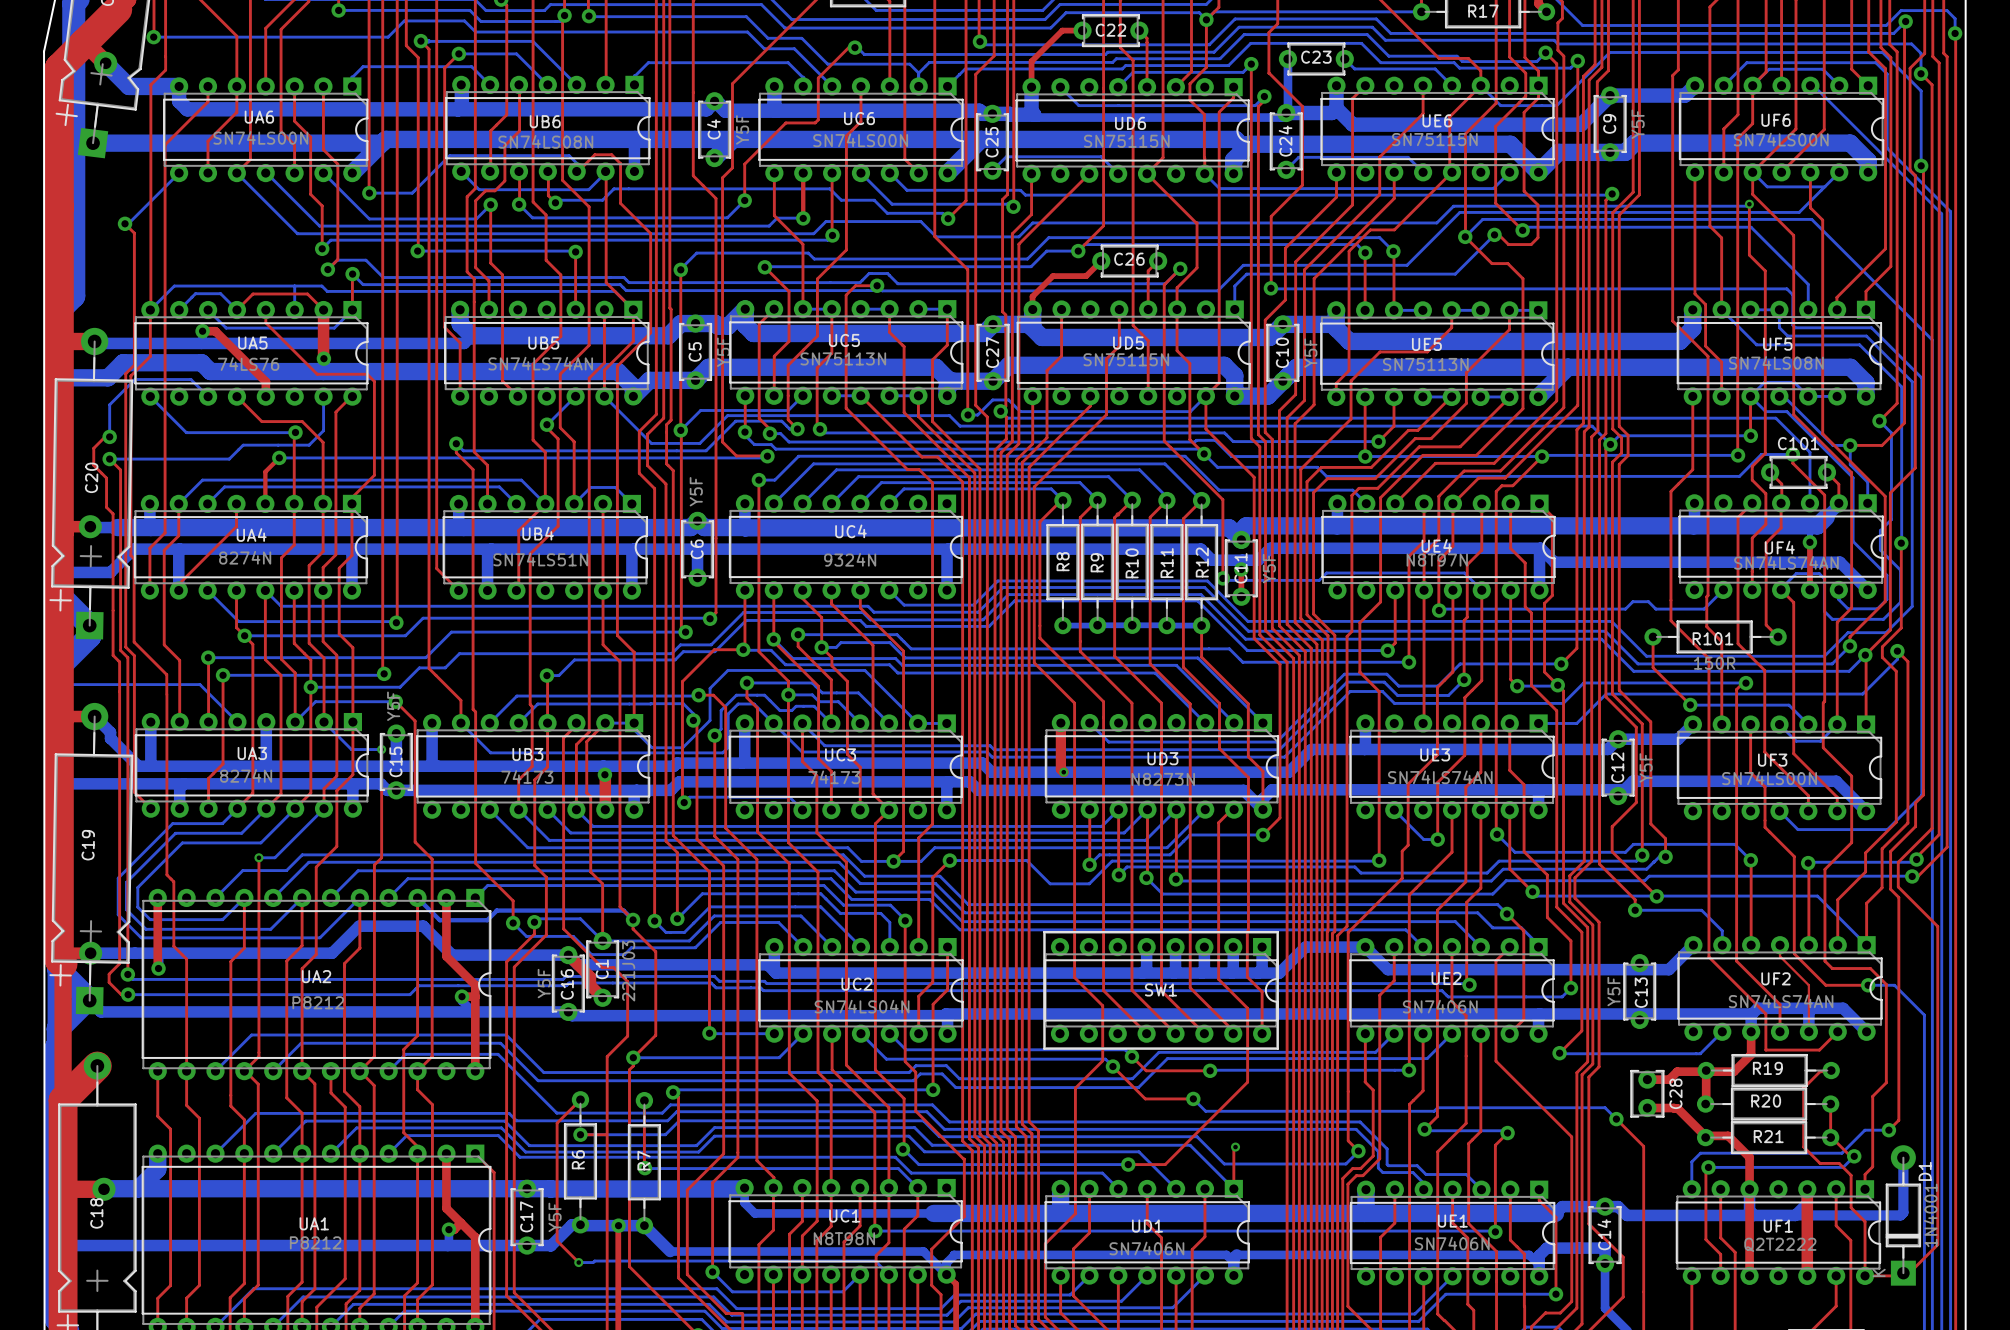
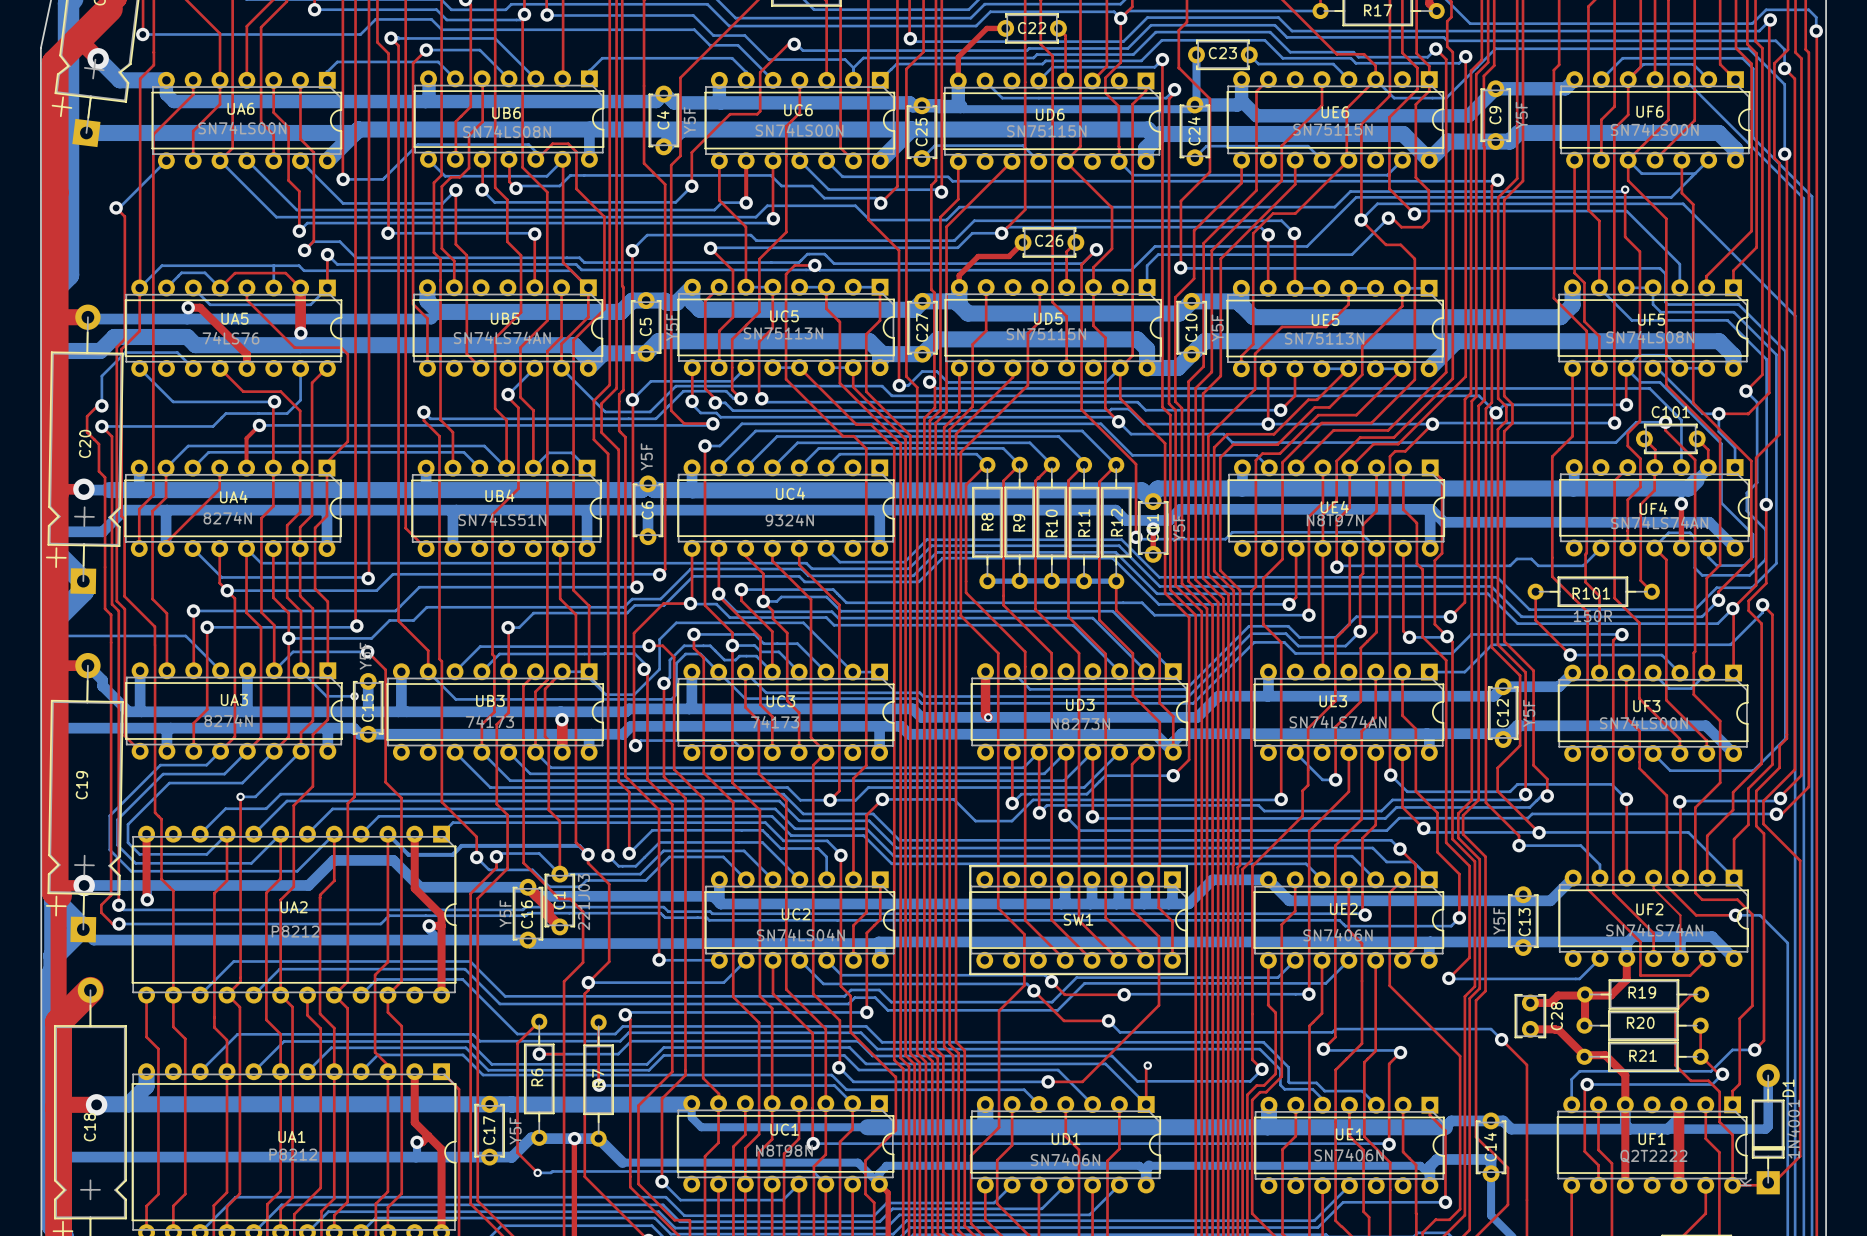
top track: (545, 503) (518, 530) (518, 588) (516, 590) -> none
top track: (603, 503) (603, 590) -> none

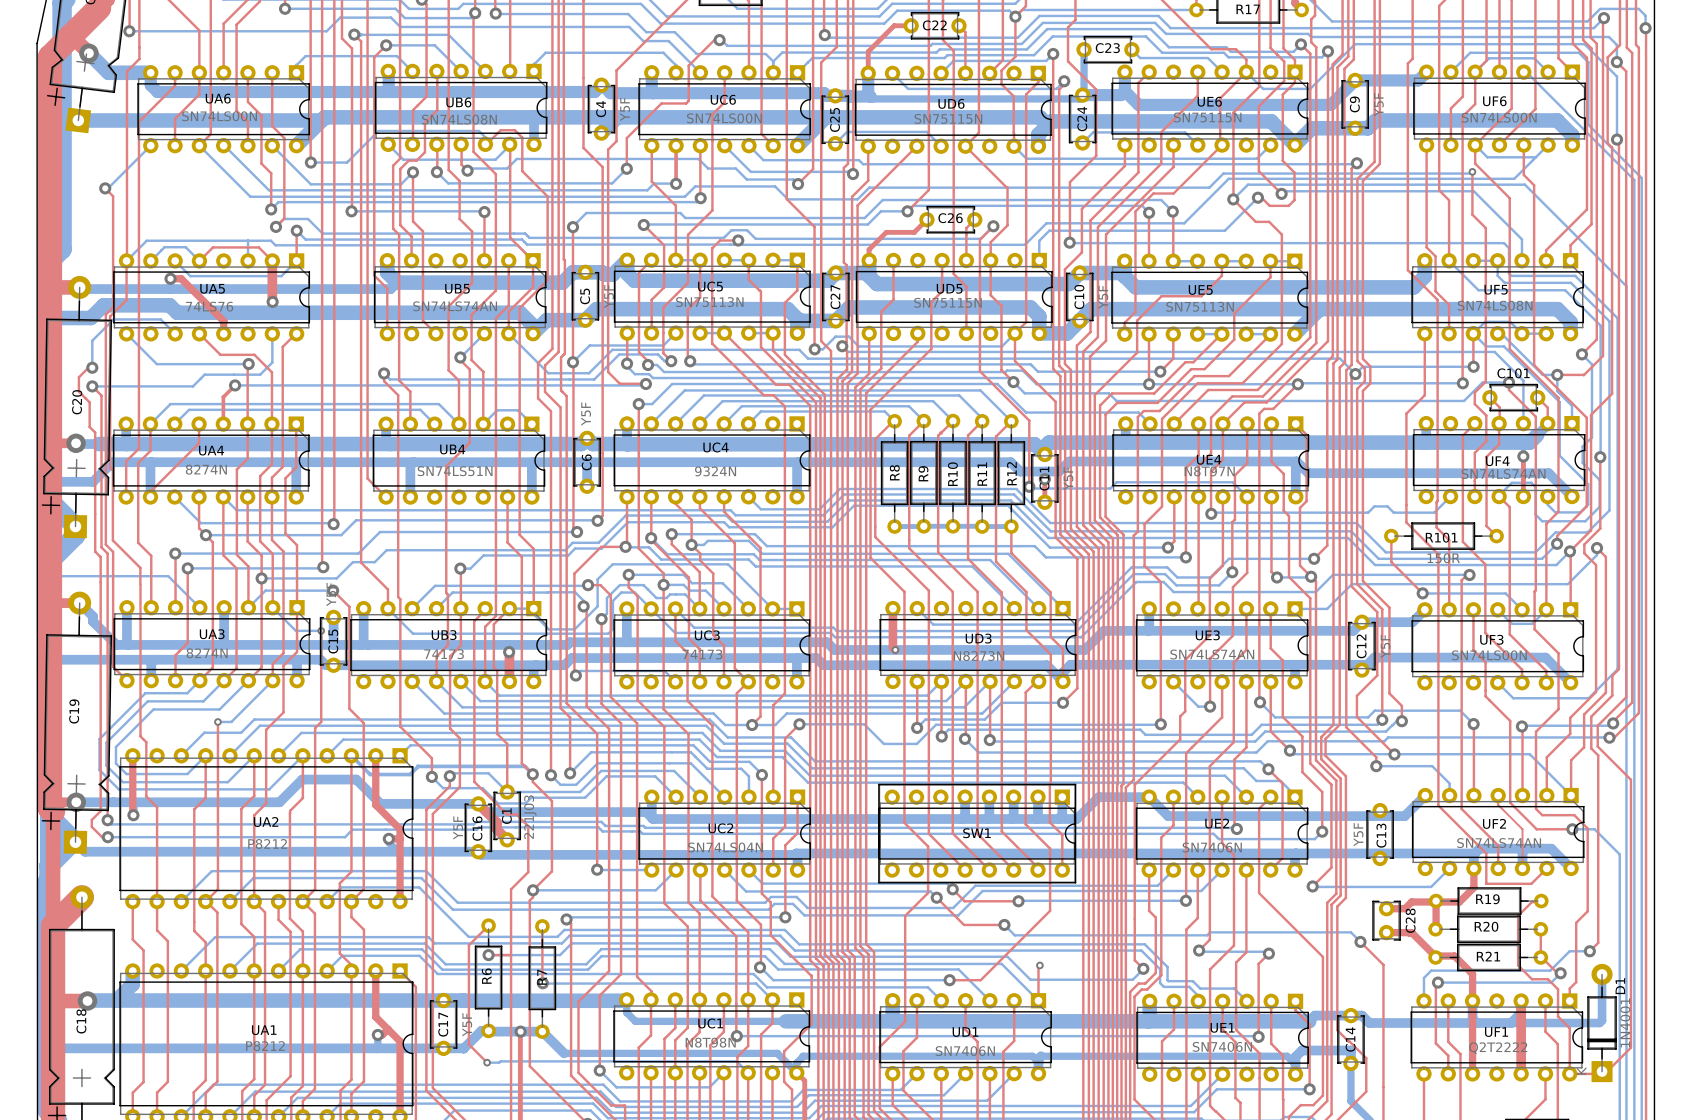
top track: (246, 288) (246, 299) (294, 347) (341, 347) (347, 354) (347, 441) (326, 462) (326, 468) -> none

